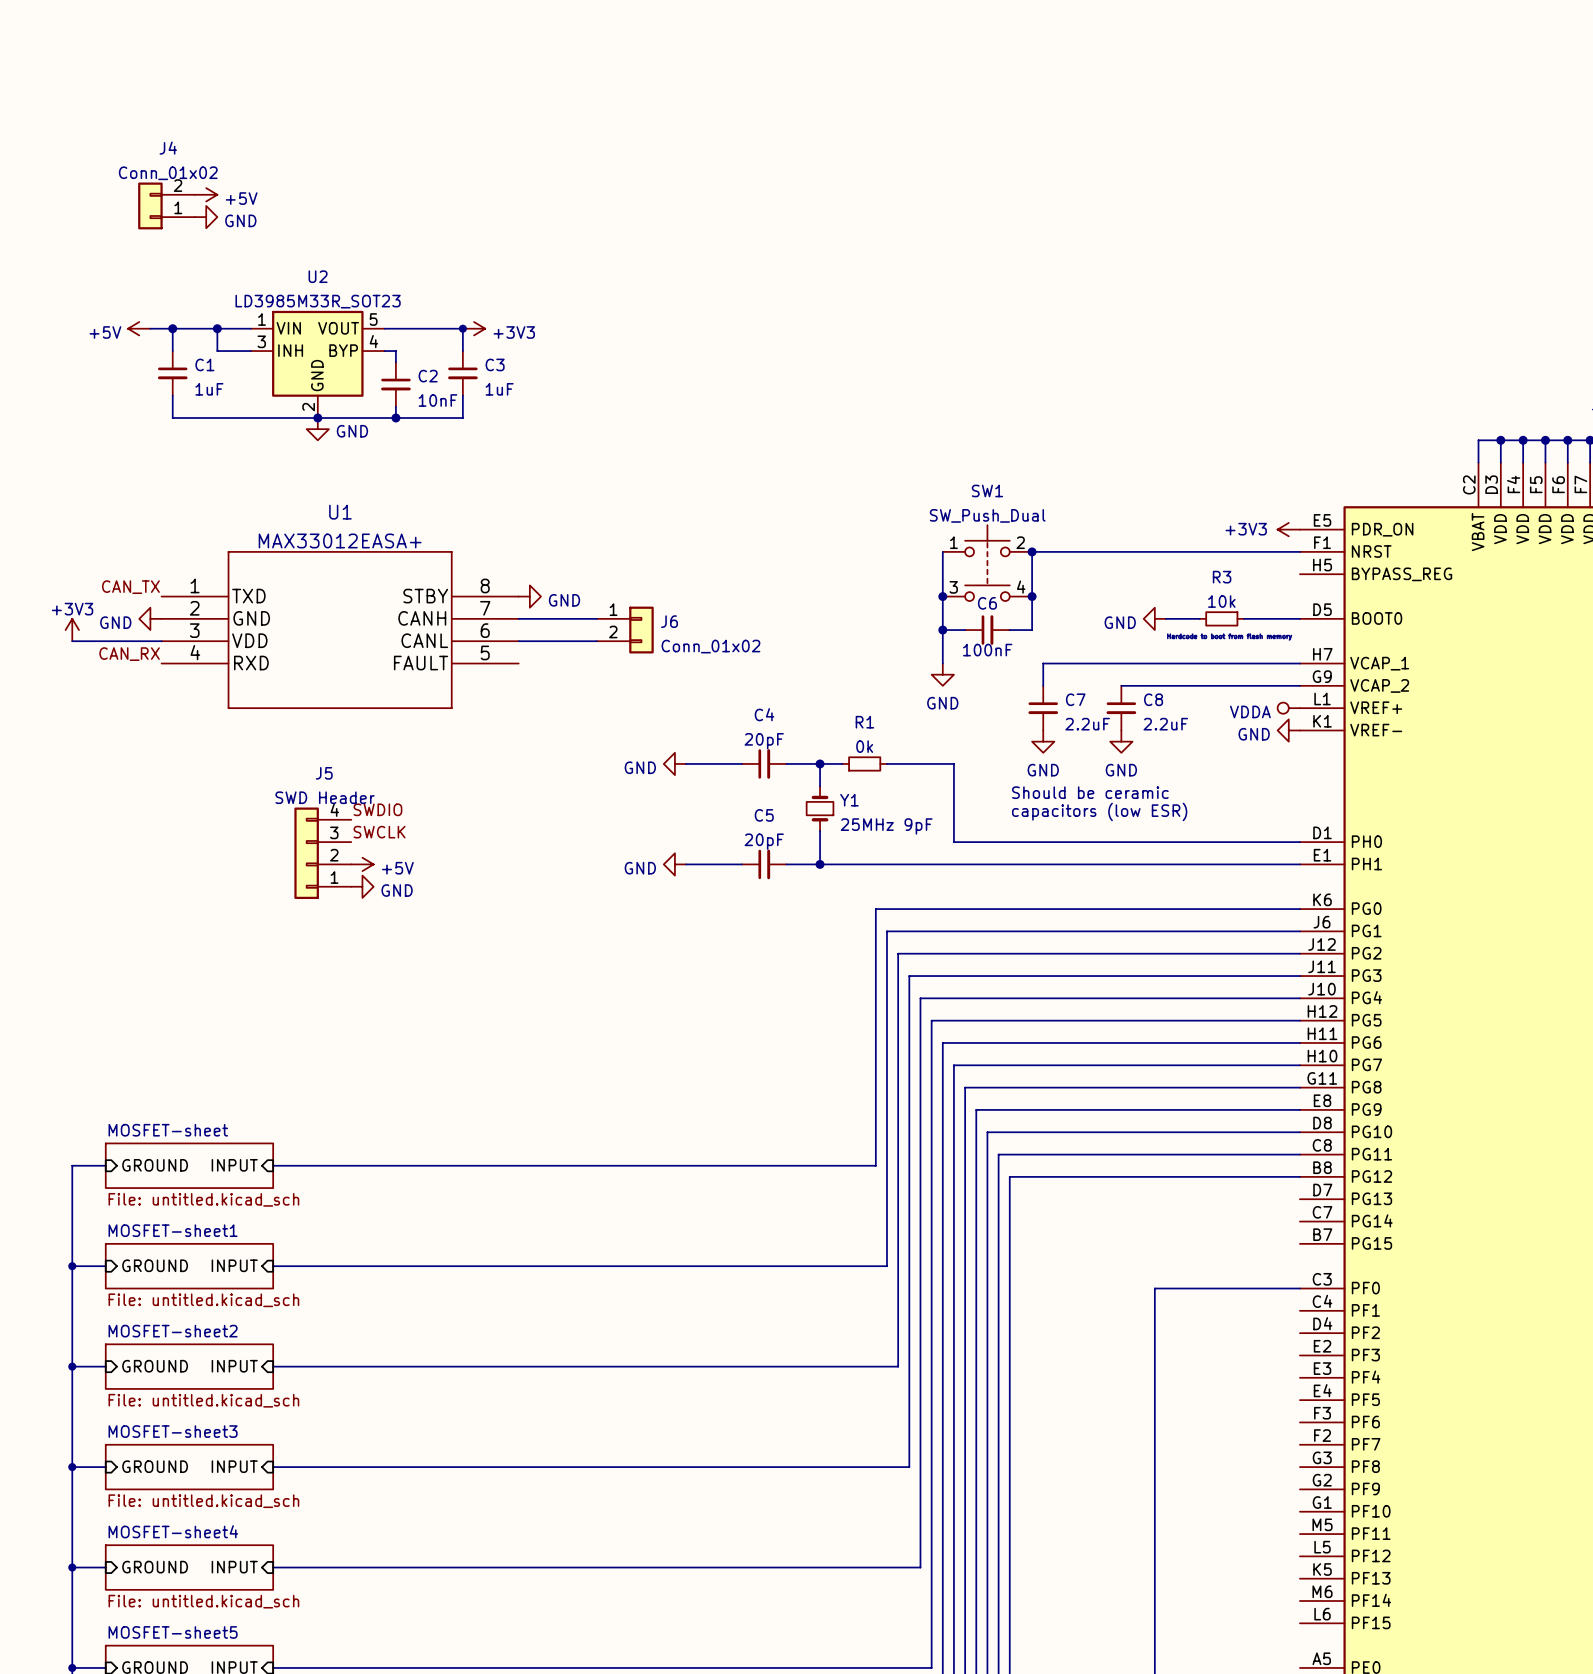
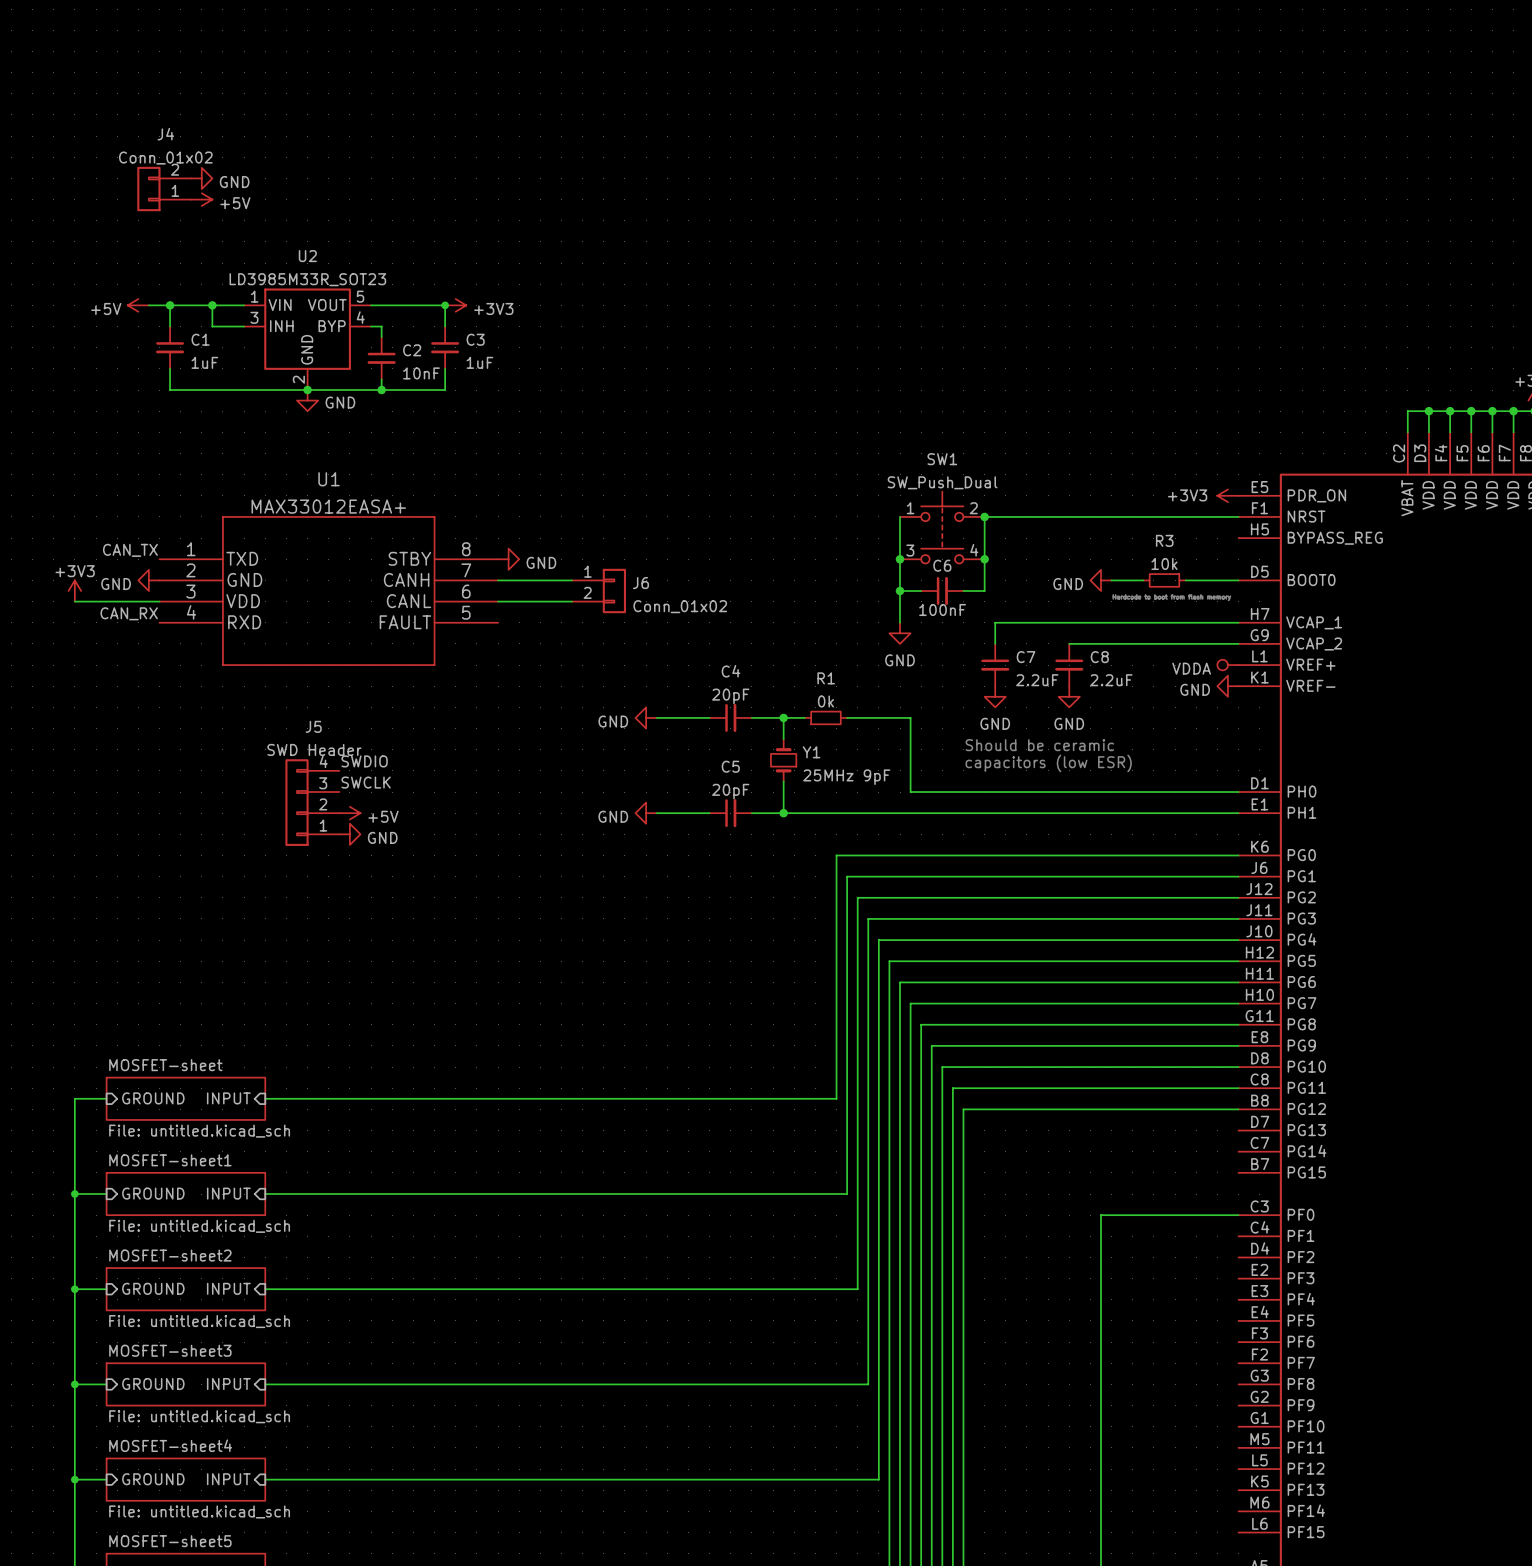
power symbol: +5V (206, 194) -> GND (201, 178)
power symbol: GND (206, 217) -> +5V (201, 199)

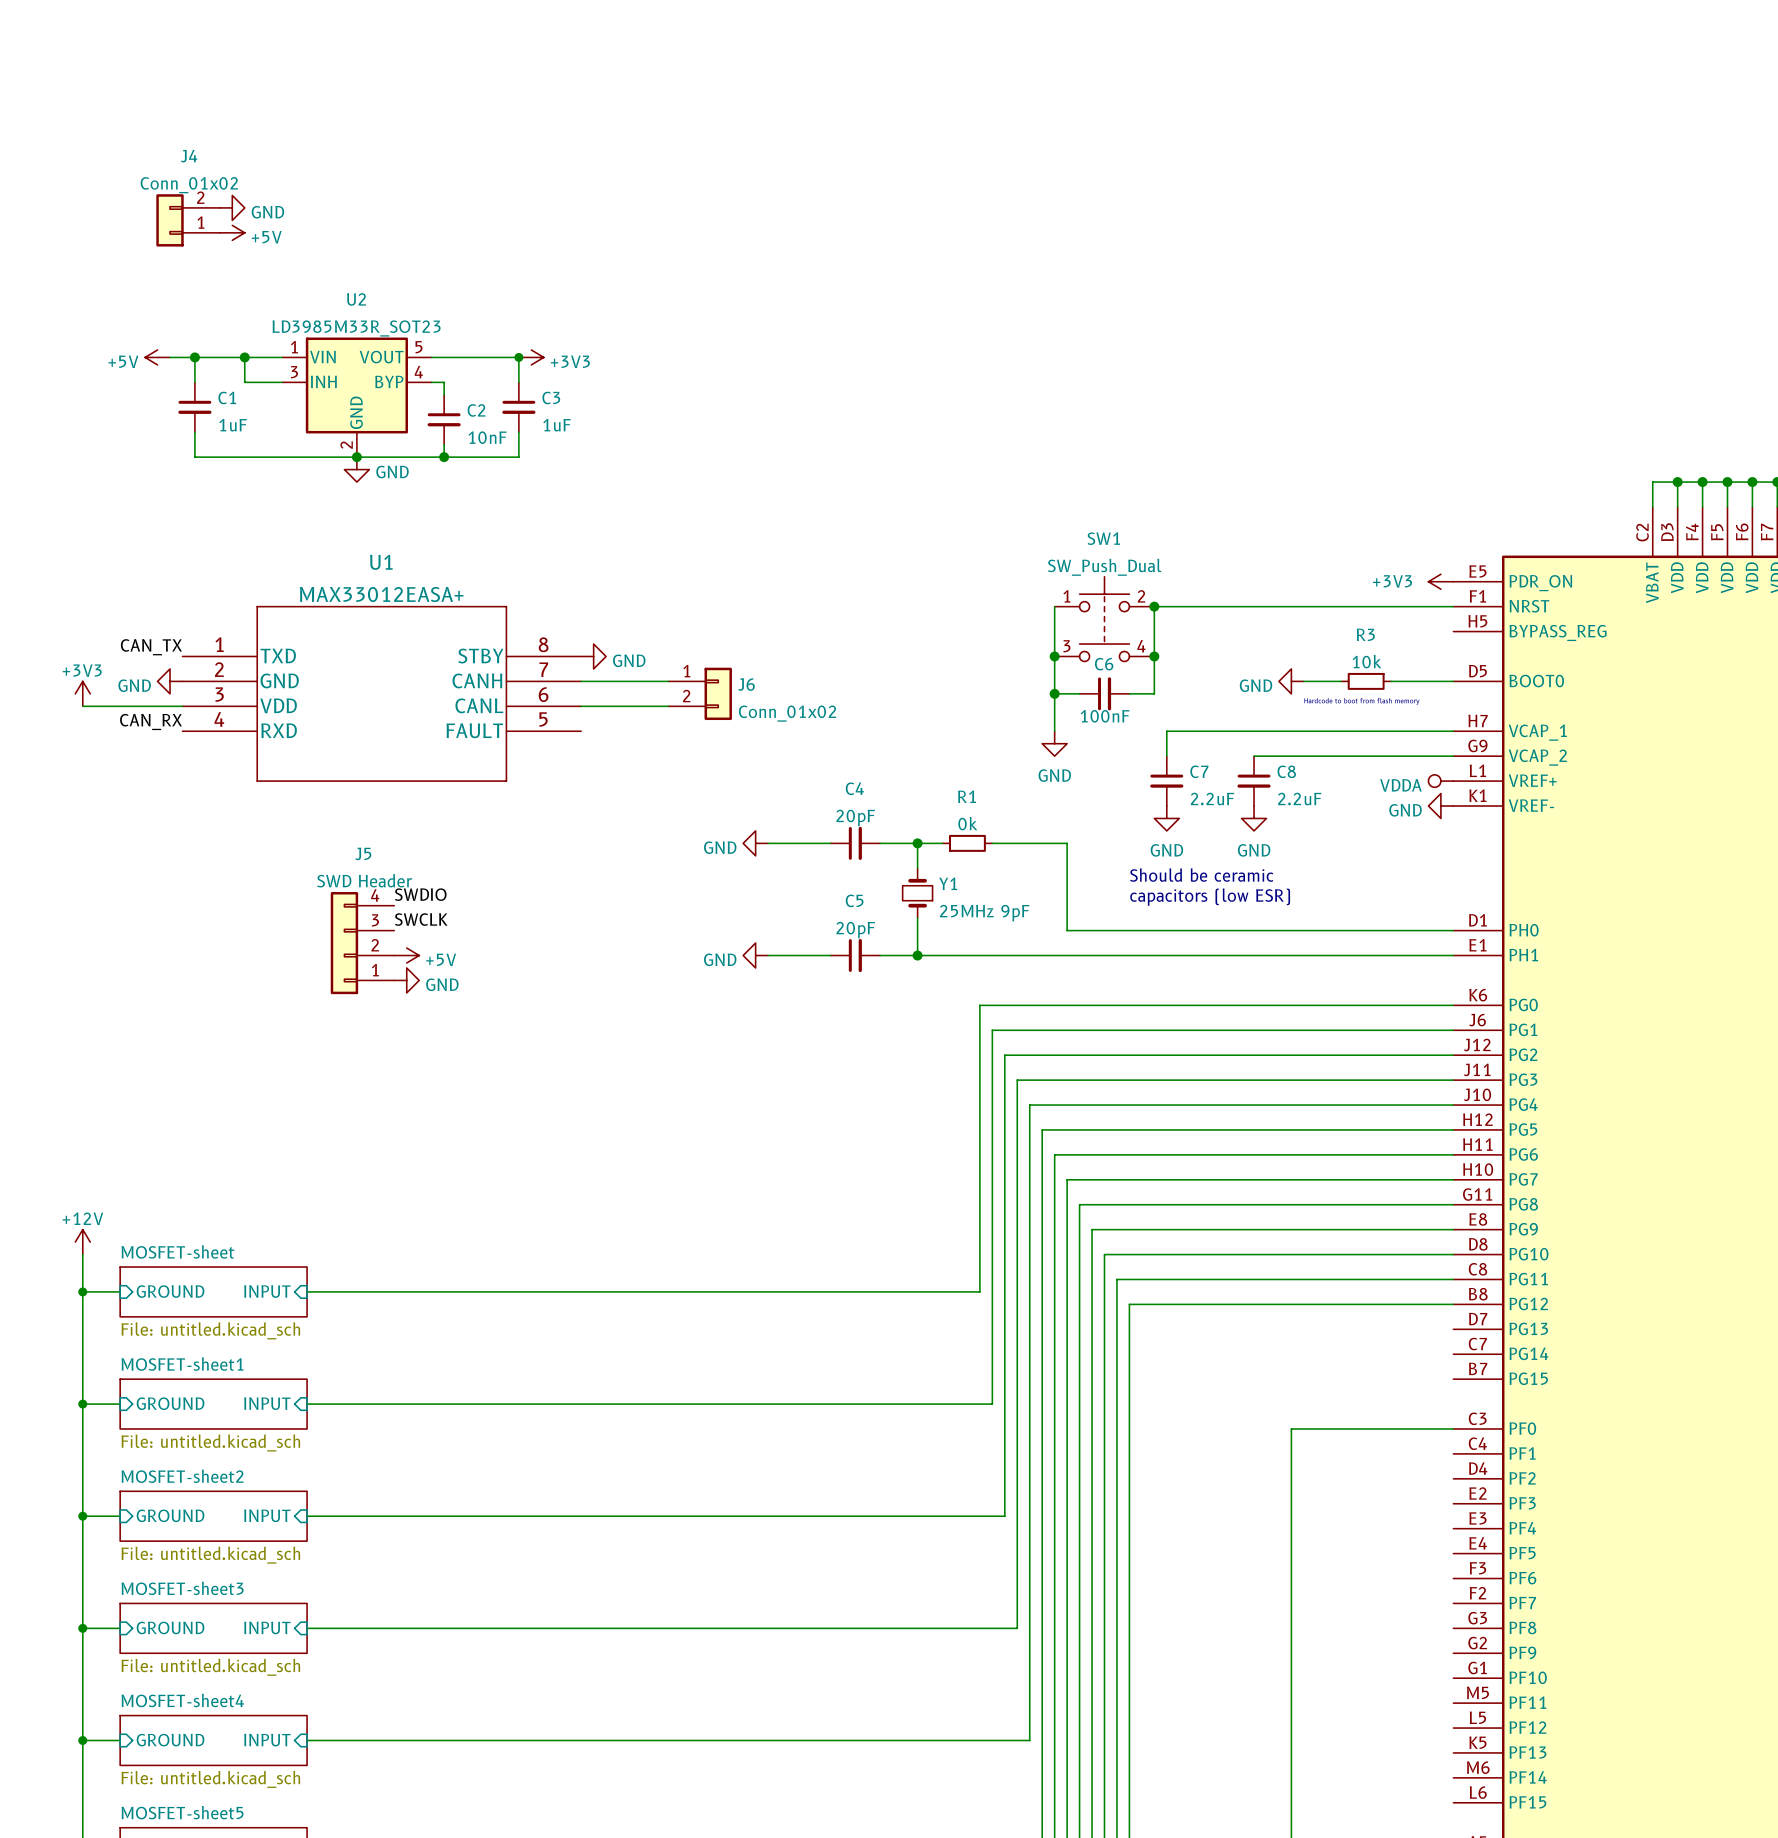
power symbol: none -> +12V (82, 1242)
wire: none -> (82, 1254) (82, 1291)
junction: none -> (82, 1291)

